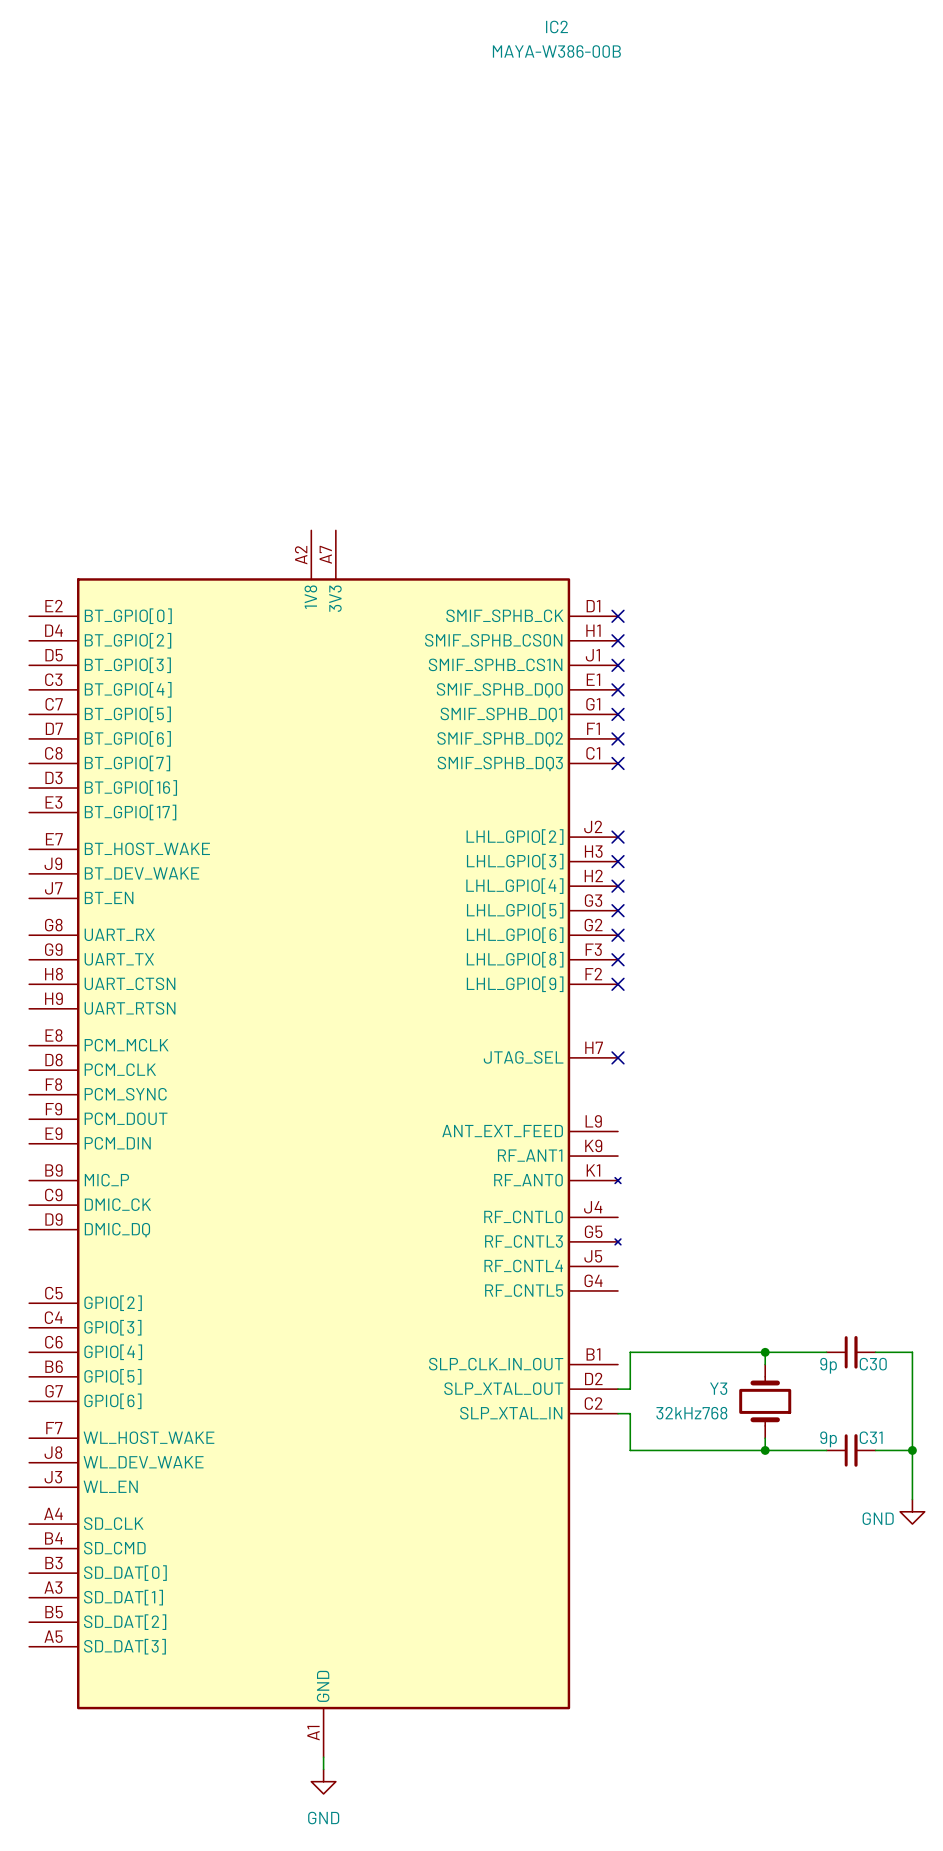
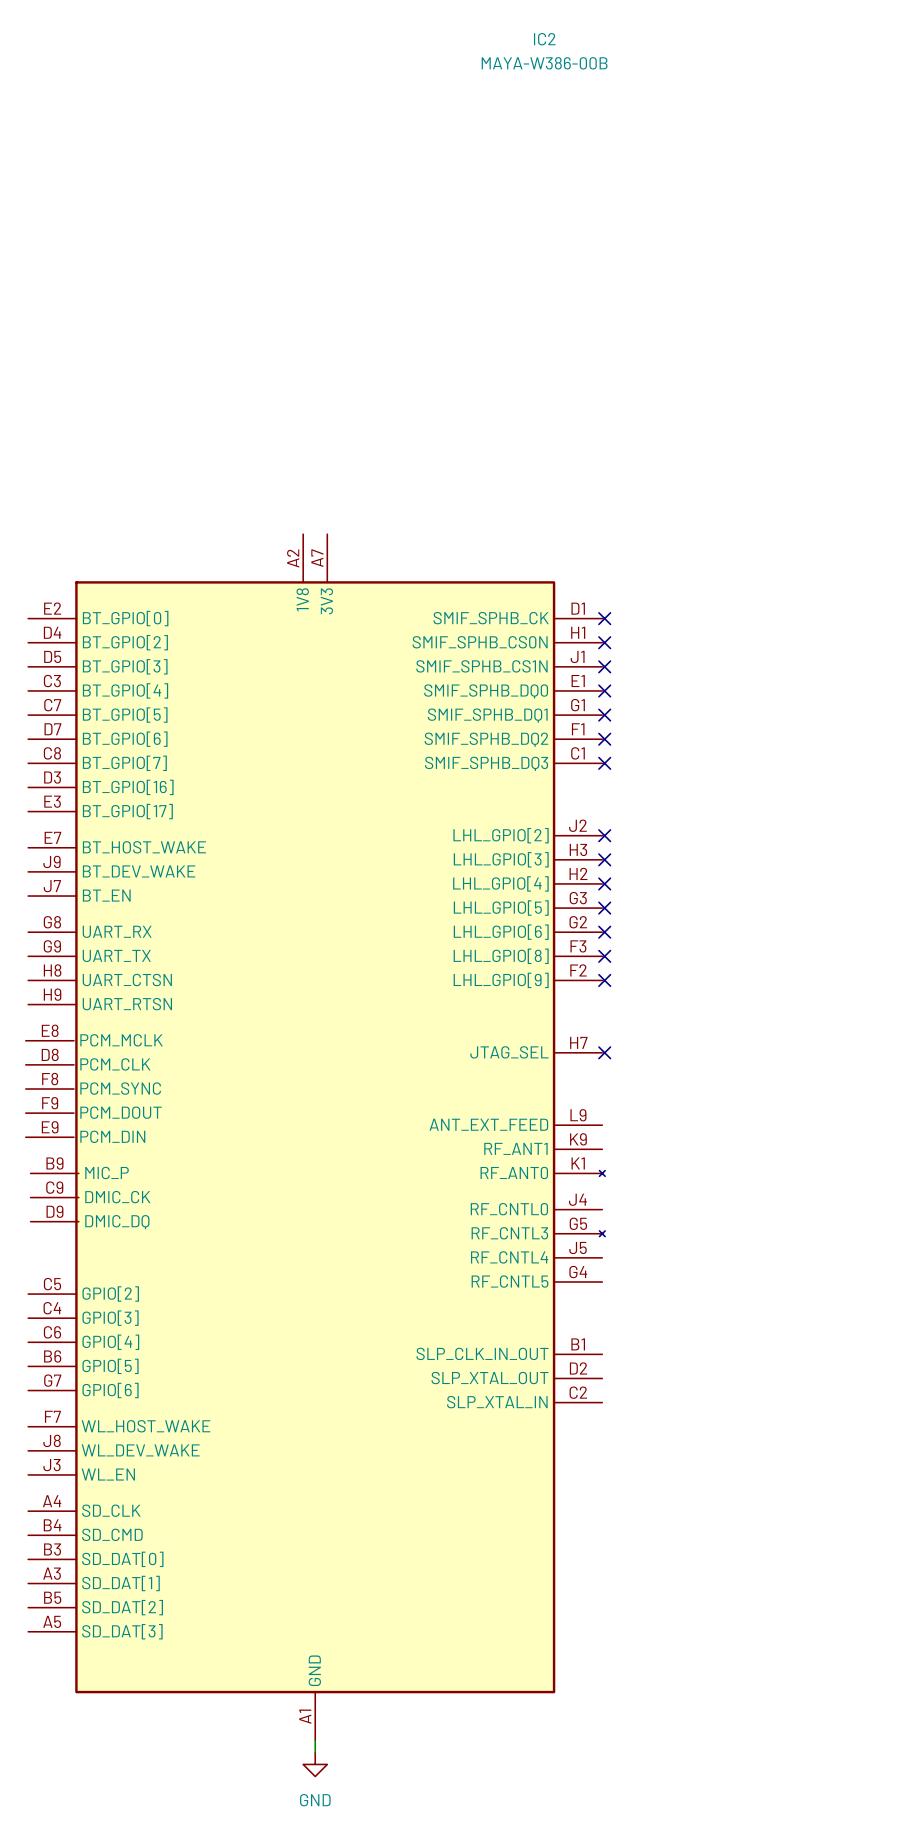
IC2 symbol: [29, 530, 621, 1758] -> [25, 534, 606, 1741]
wire: (765, 1352) (765, 1364) -> none
junction: (765, 1352) -> none
wire: (826, 1352) (630, 1352) (630, 1389) (618, 1389) -> none
C30: 9p (851, 1352) -> none
wire: (875, 1352) (912, 1352) (912, 1499) -> none
Y3: 32kHz768 (765, 1401) -> none
wire: (618, 1413) (630, 1413) (630, 1450) (826, 1450) -> none
wire: (765, 1438) (765, 1450) -> none
junction: (765, 1450) -> none
C31: 9p (851, 1450) -> none
wire: (875, 1450) (912, 1450) -> none
junction: (912, 1450) -> none
power symbol: GND (912, 1511) -> none

